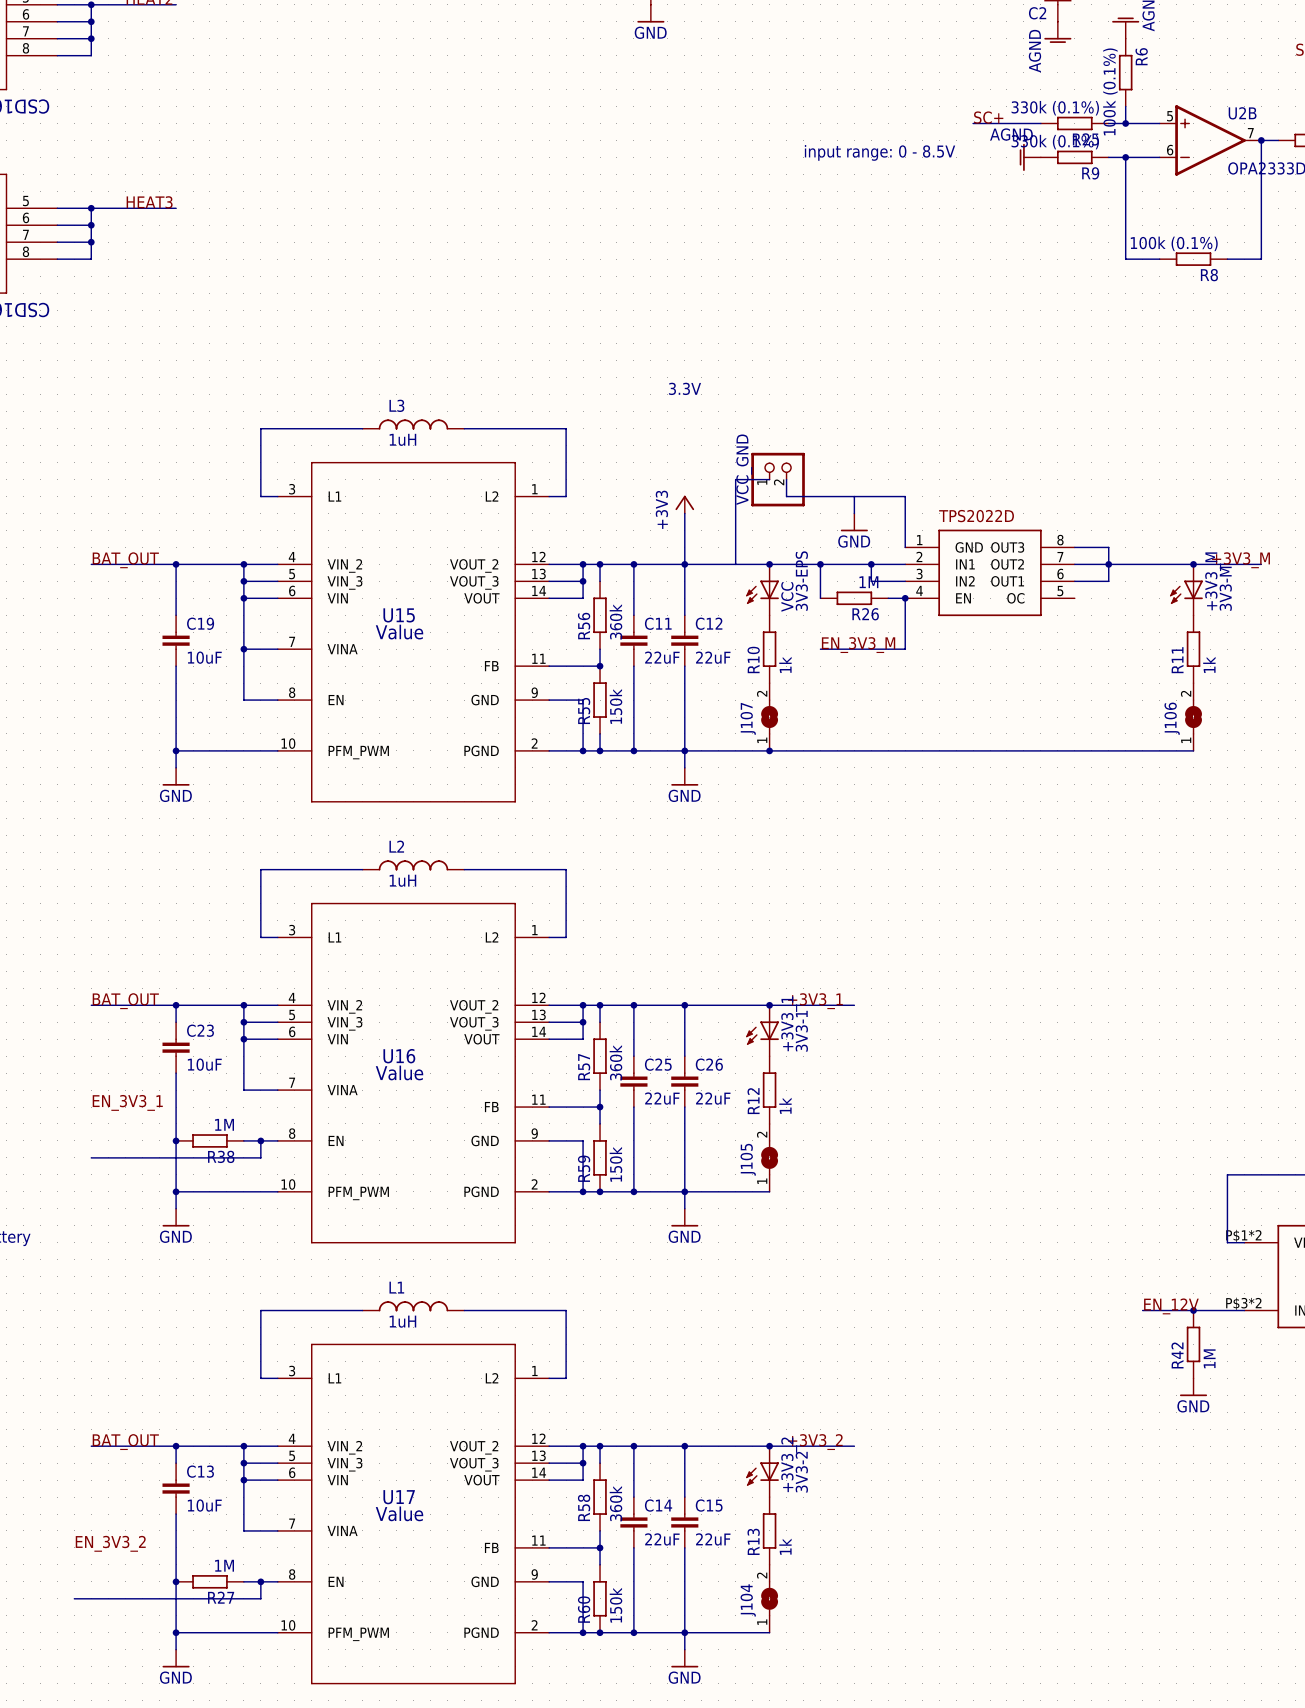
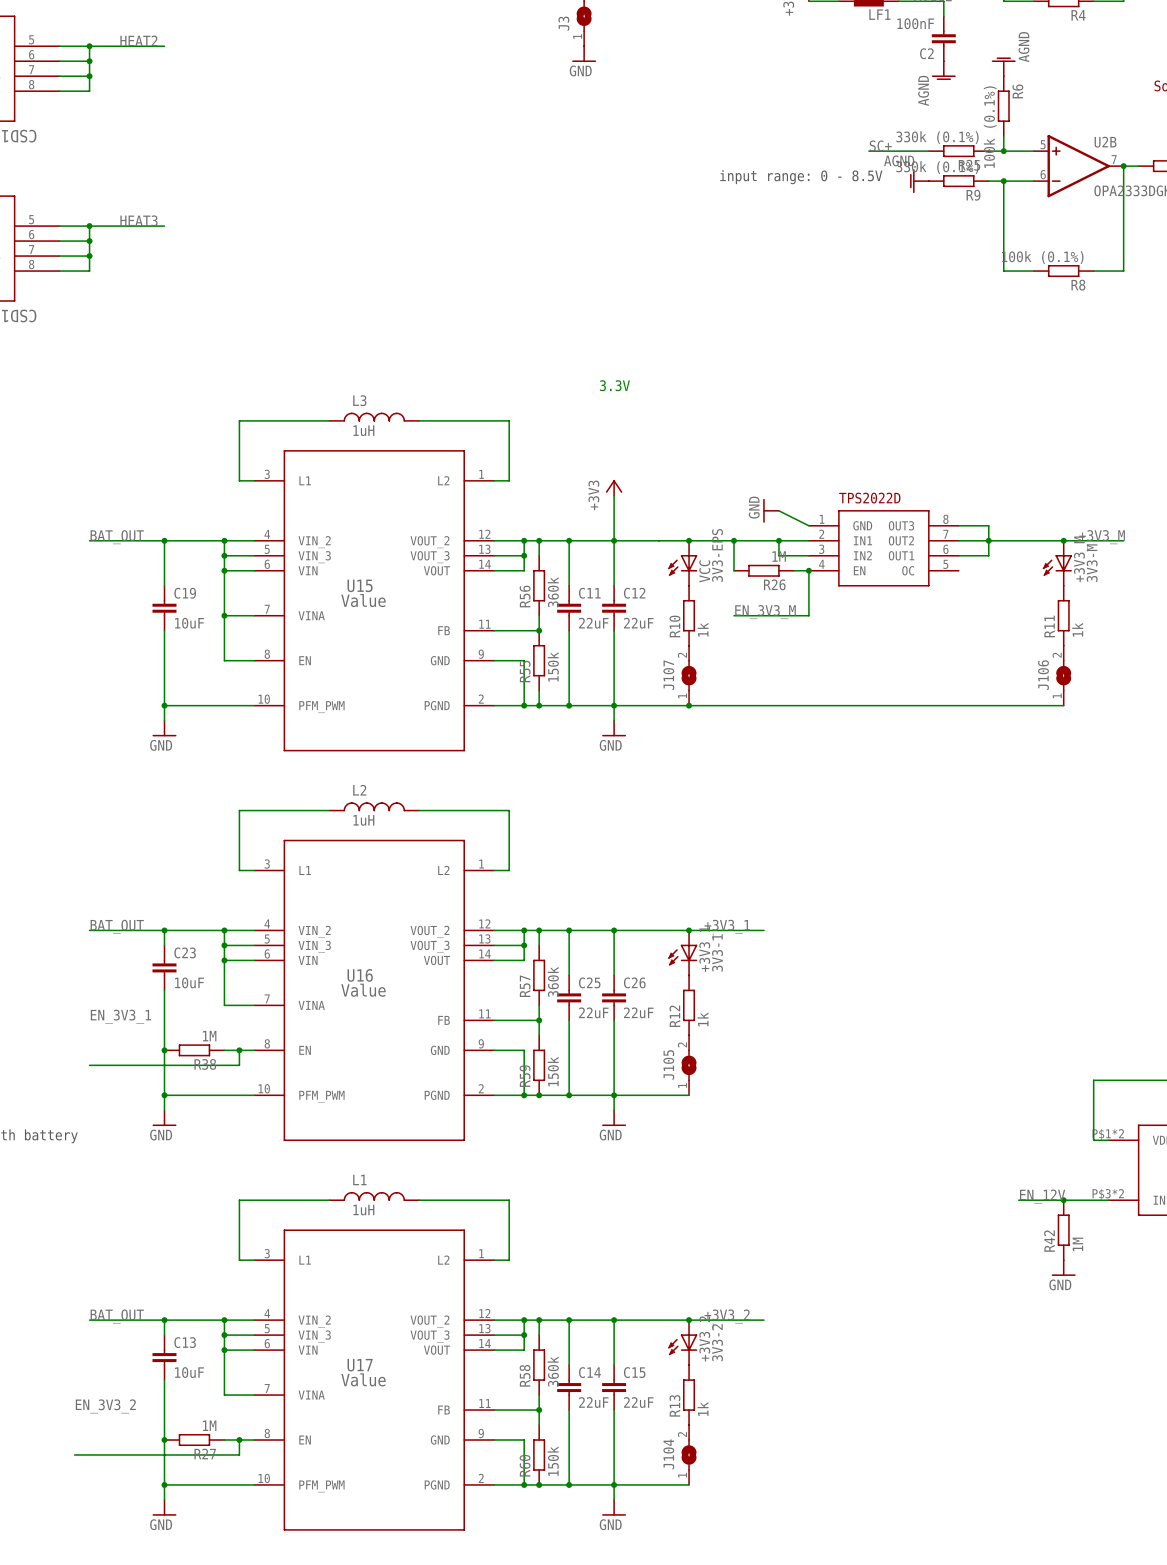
wire: (769, 479) (735, 479) (735, 564) -> none
VCC_GND: (778, 479) -> none
wire: (786, 479) (786, 496) (905, 496) (905, 547) -> (778, 510) (808, 525)
wire: (854, 496) (854, 513) -> none
power symbol rotation: 0° (854, 530) -> 90° clockwise (763, 510)

